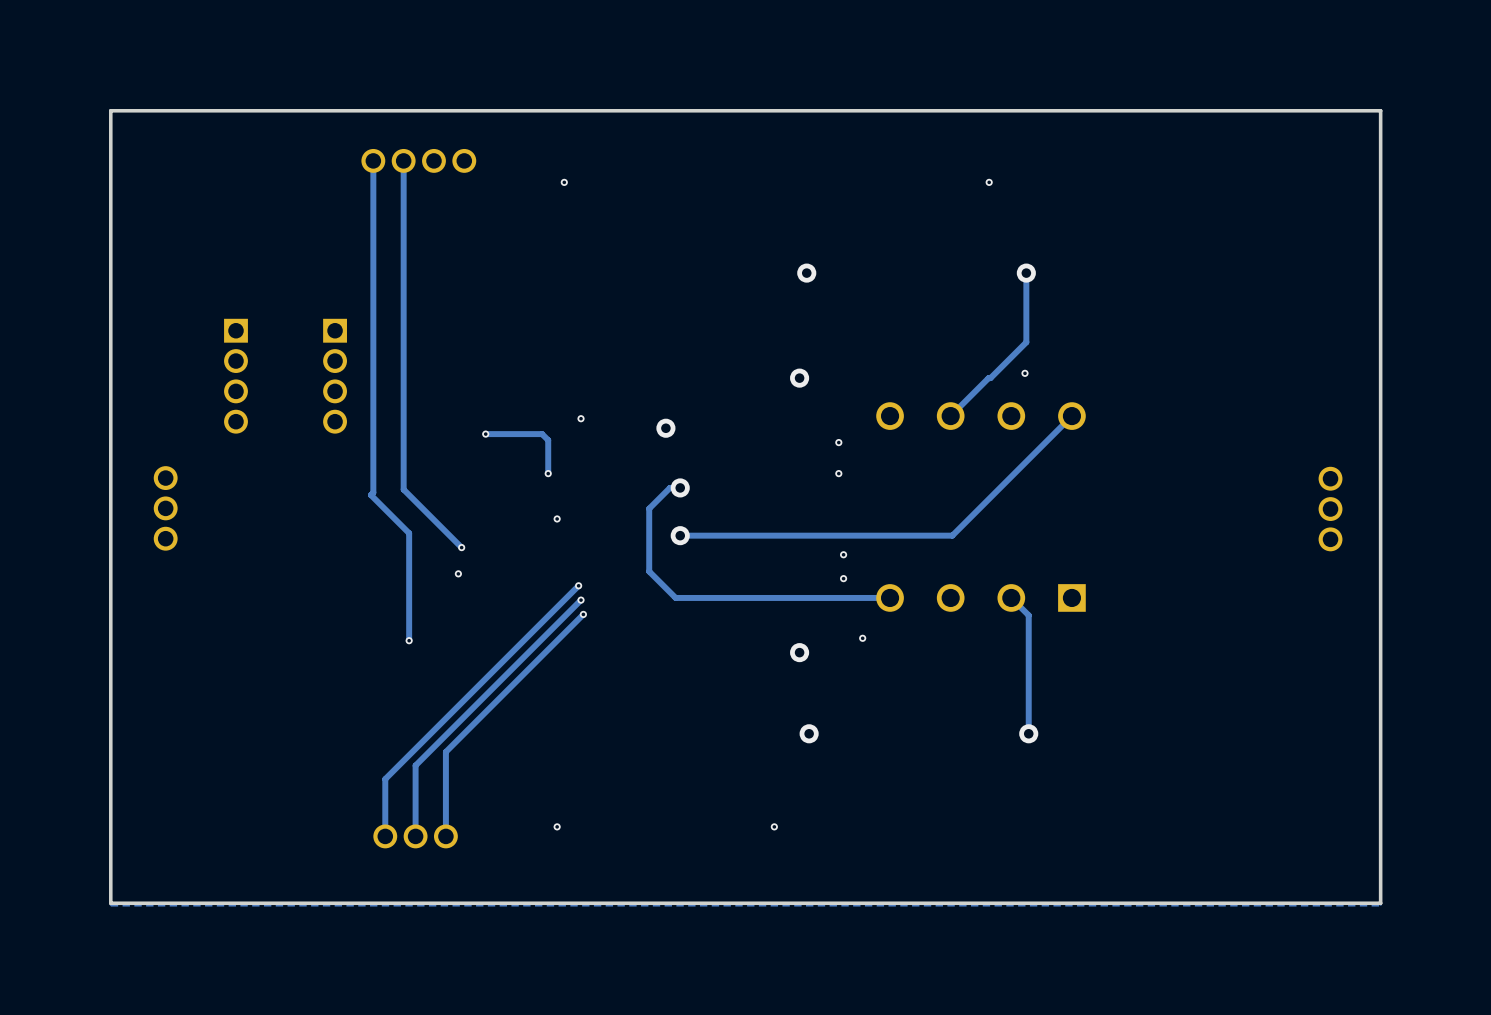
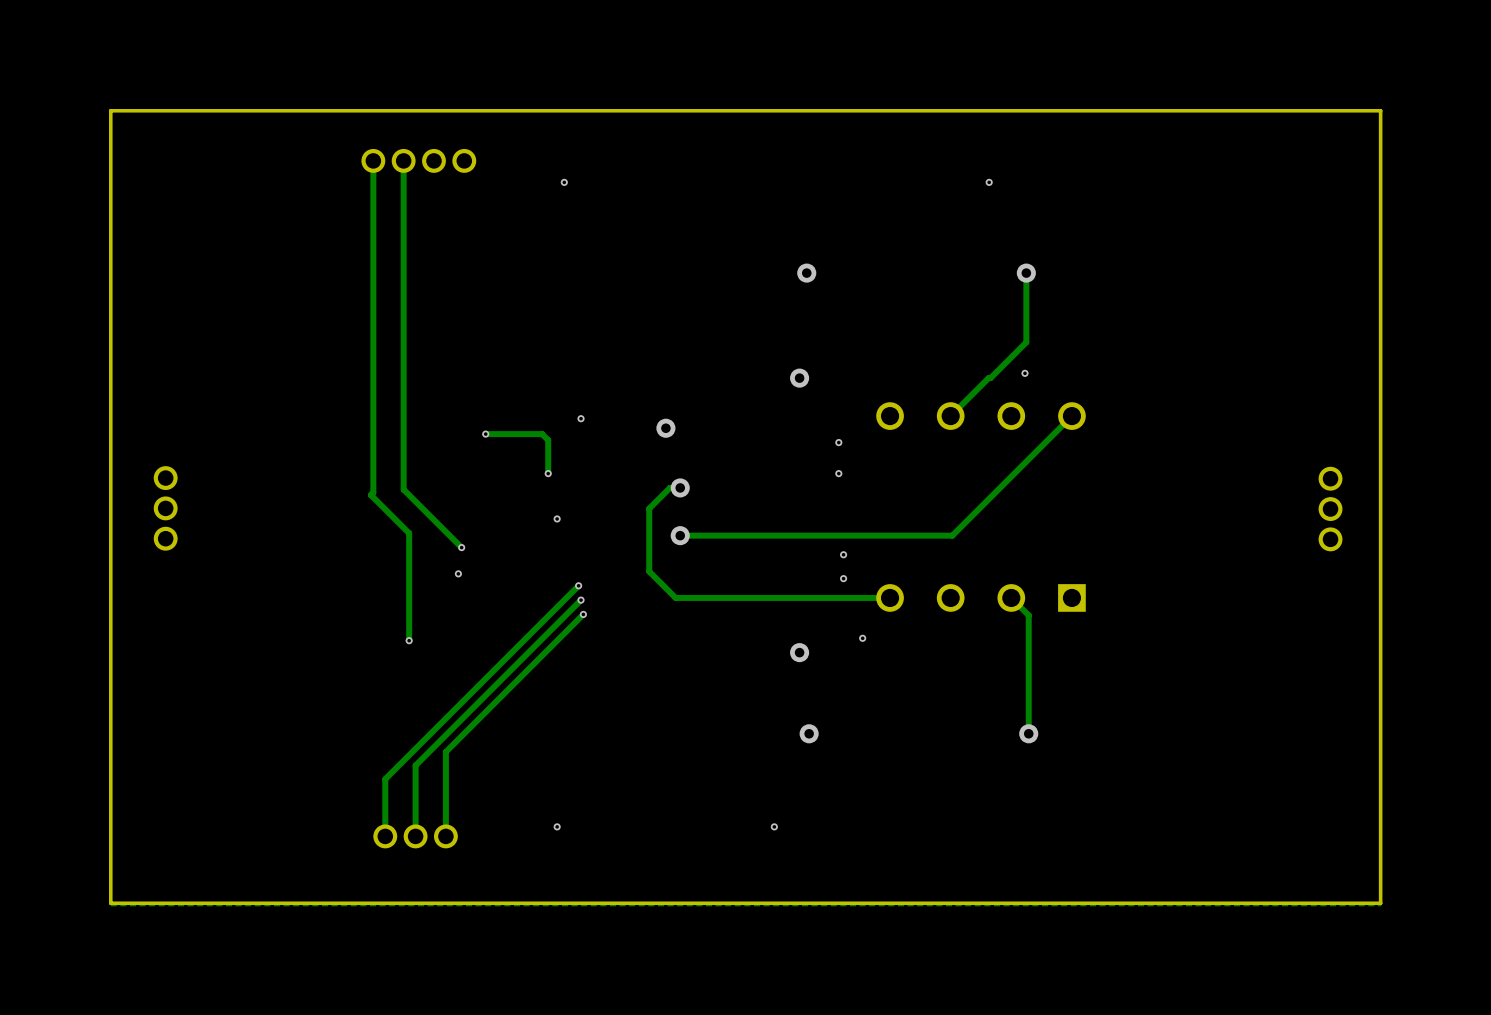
part: (235, 376) -> none
part: (335, 376) -> none

